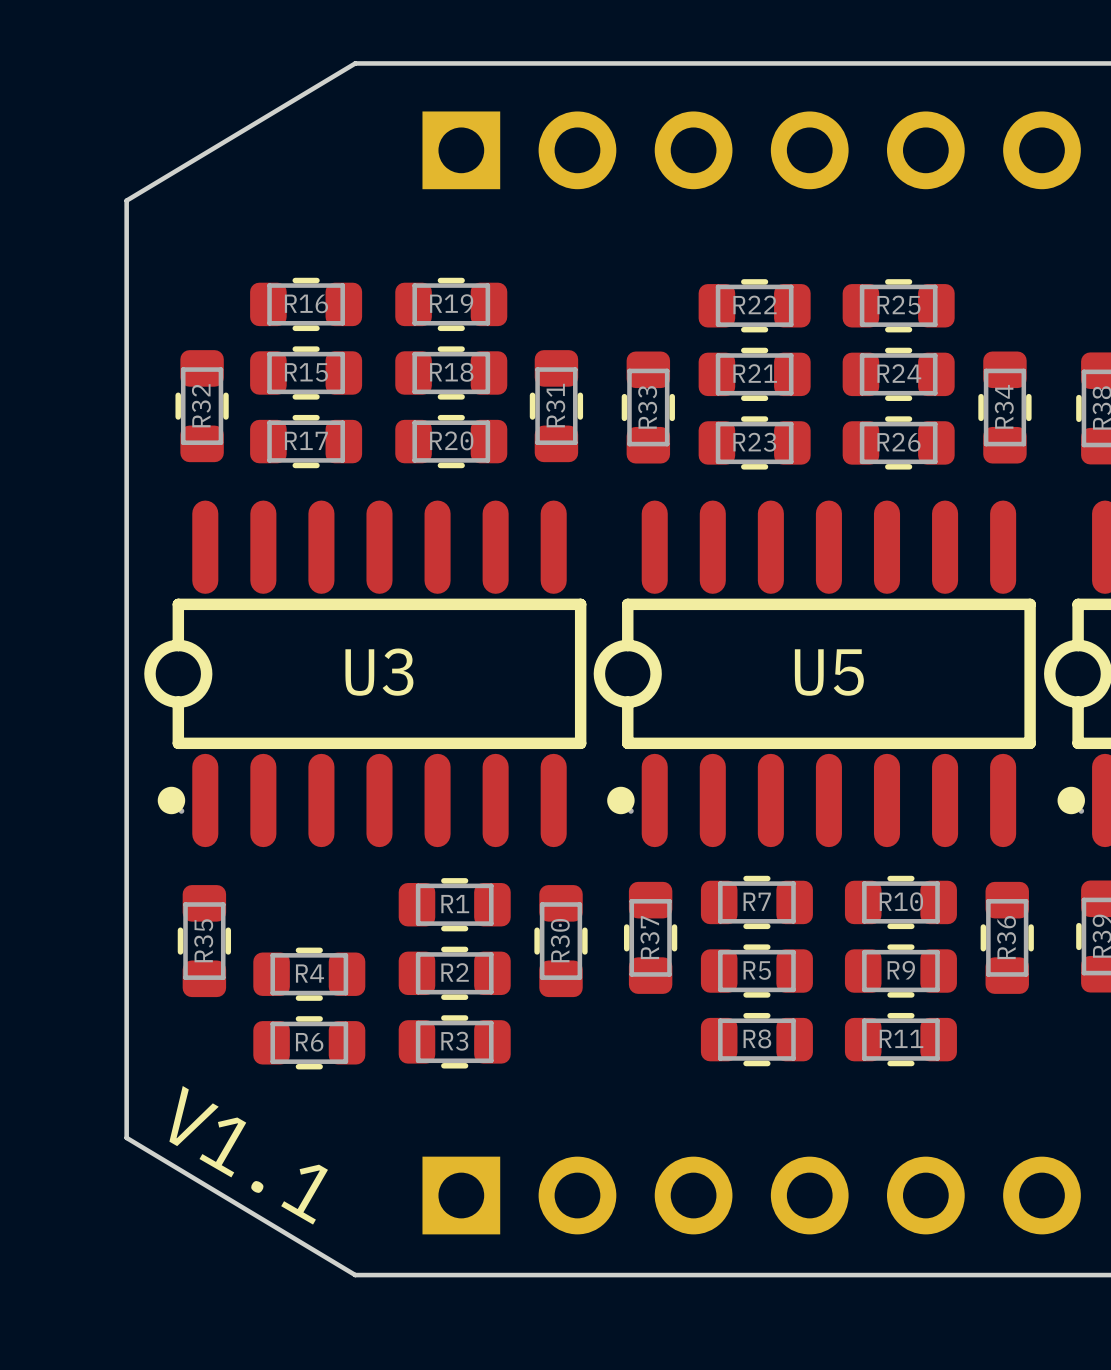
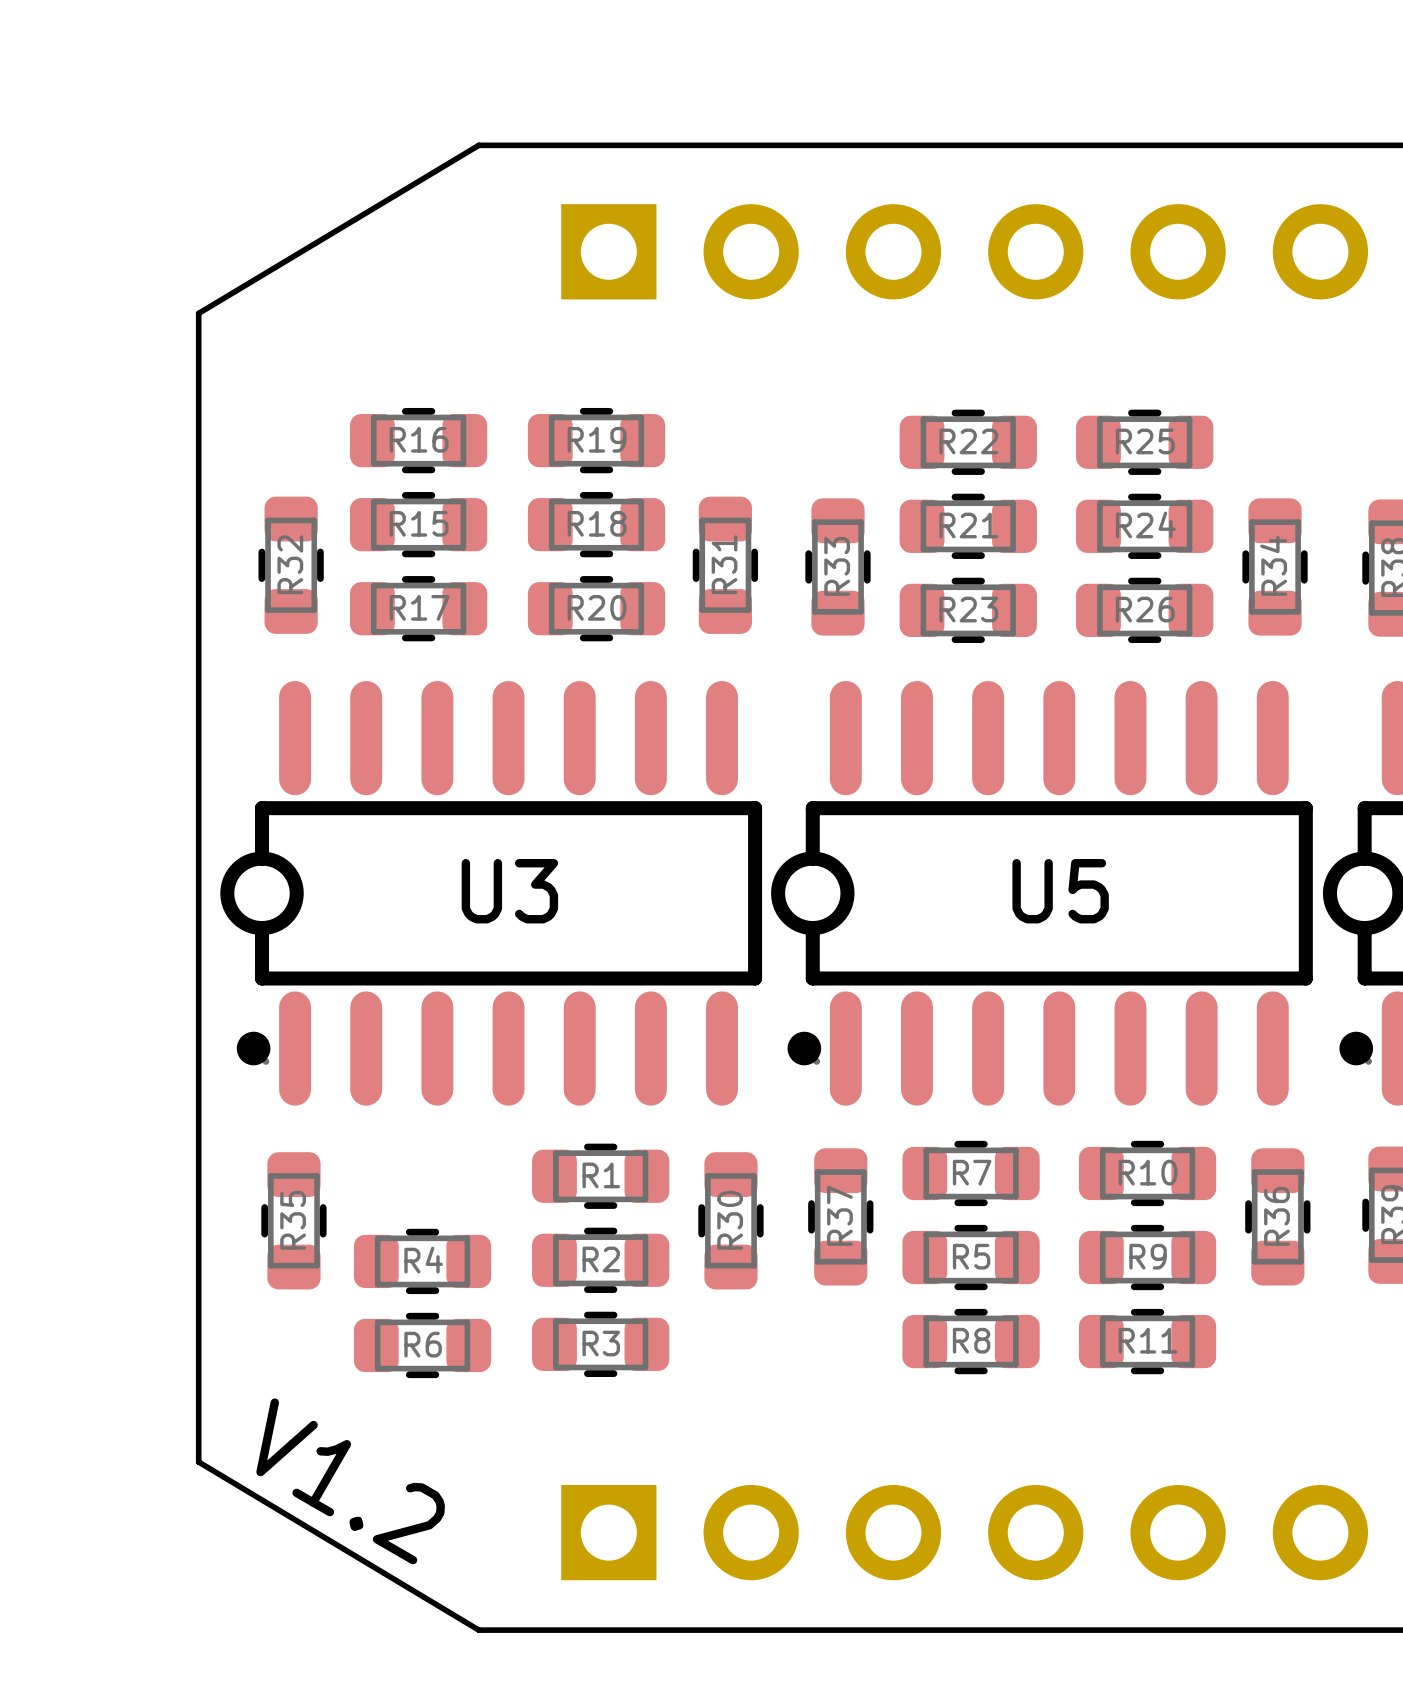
text: V1.1 (248, 1155) -> V1.2 (350, 1481)

